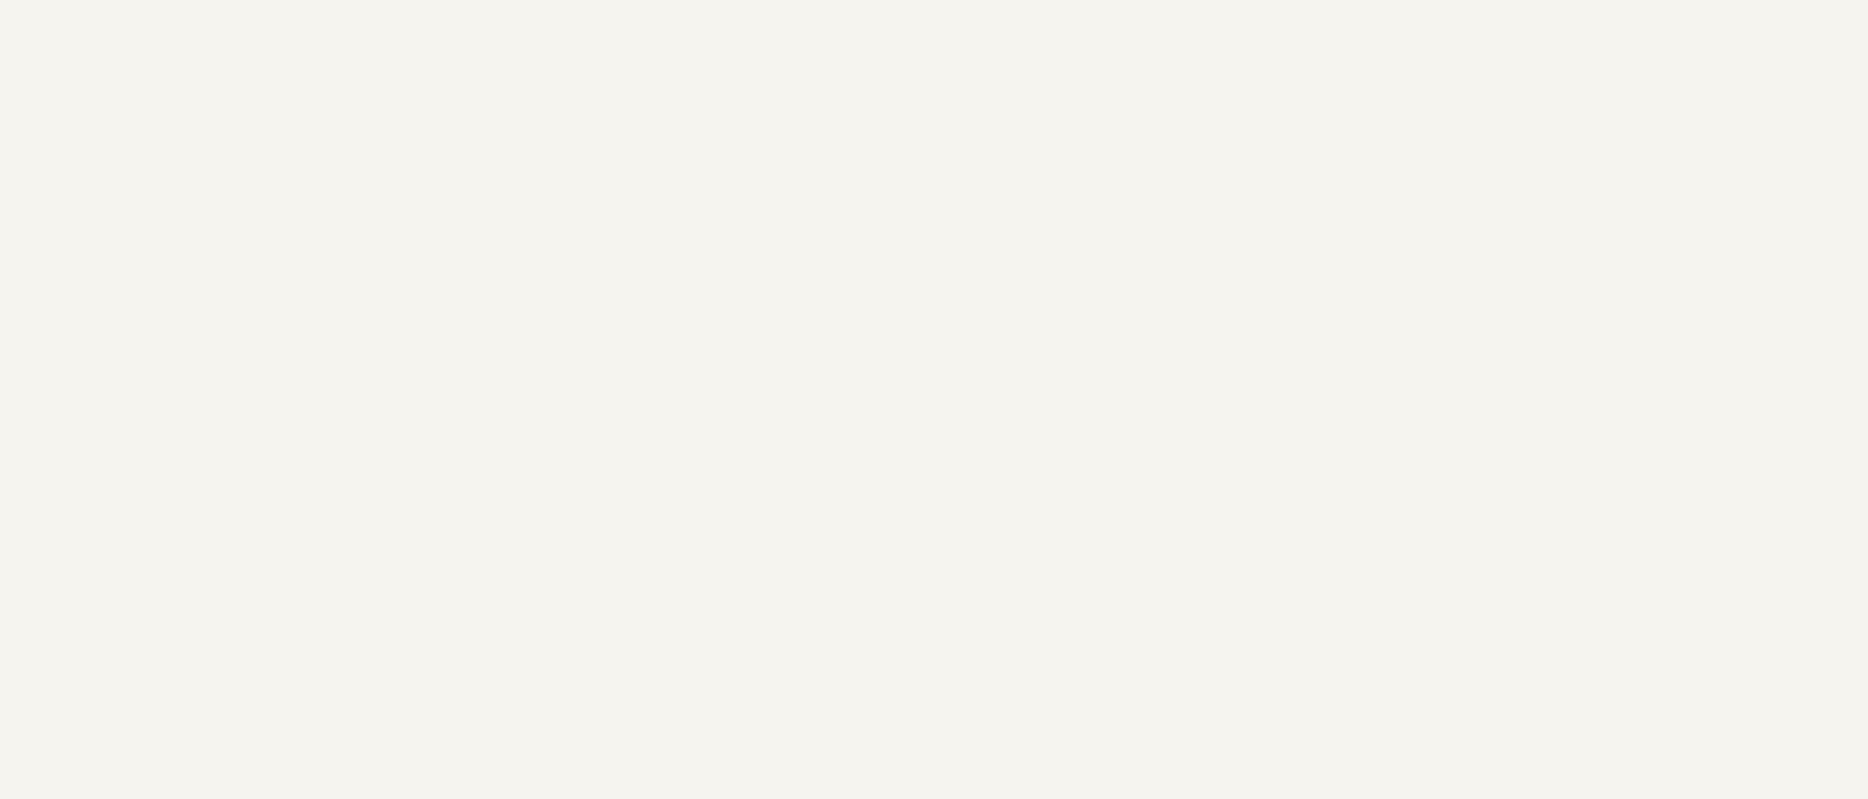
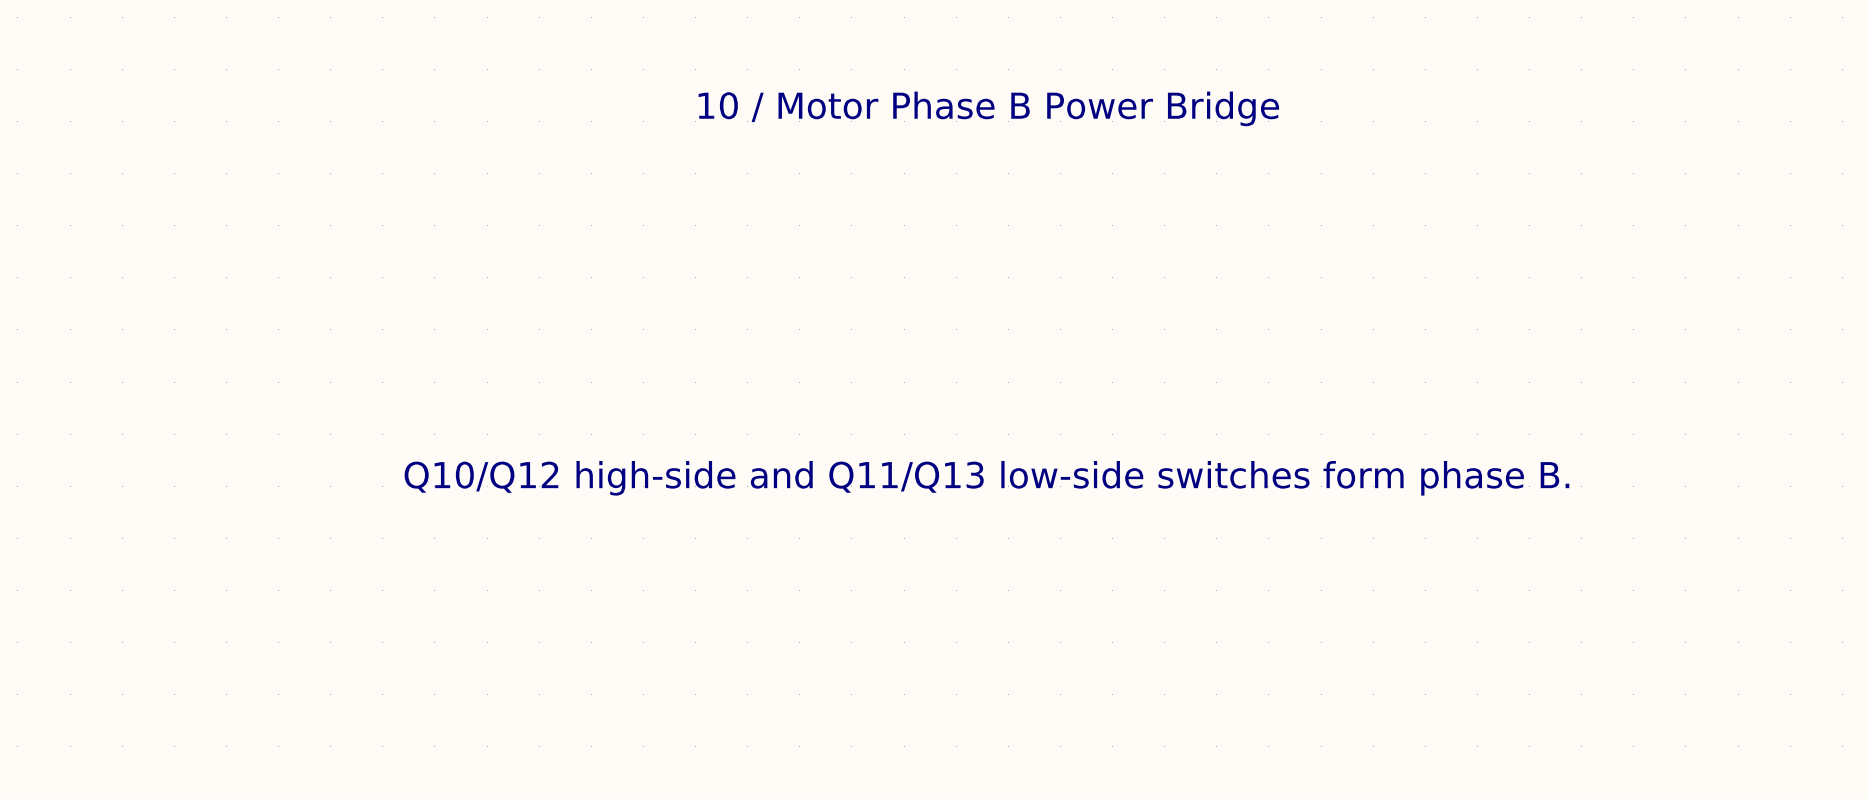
text: none -> 10 / Motor Phase B Power Bridge (988, 108)
text: none -> Q10/Q12 high-side and Q11/Q13 low-side switches form phase B. (986, 478)

